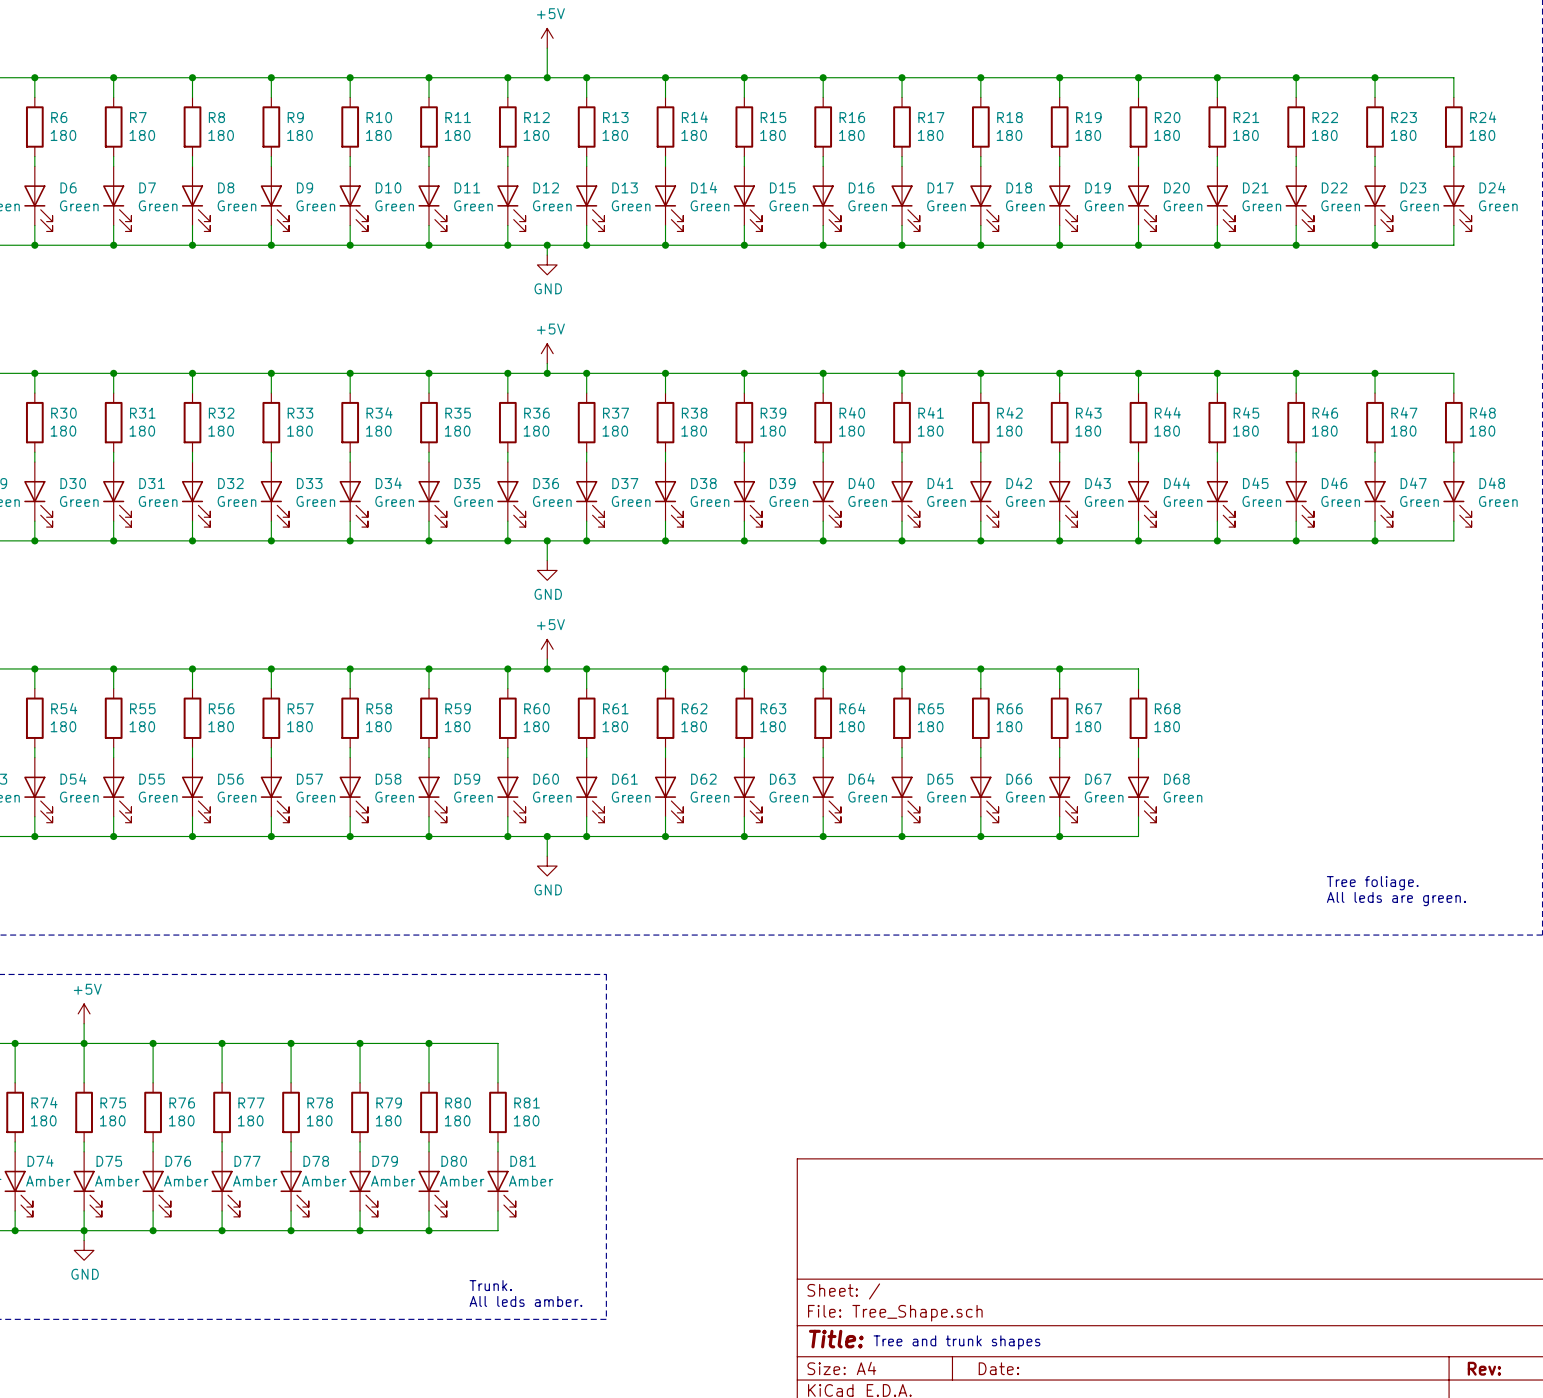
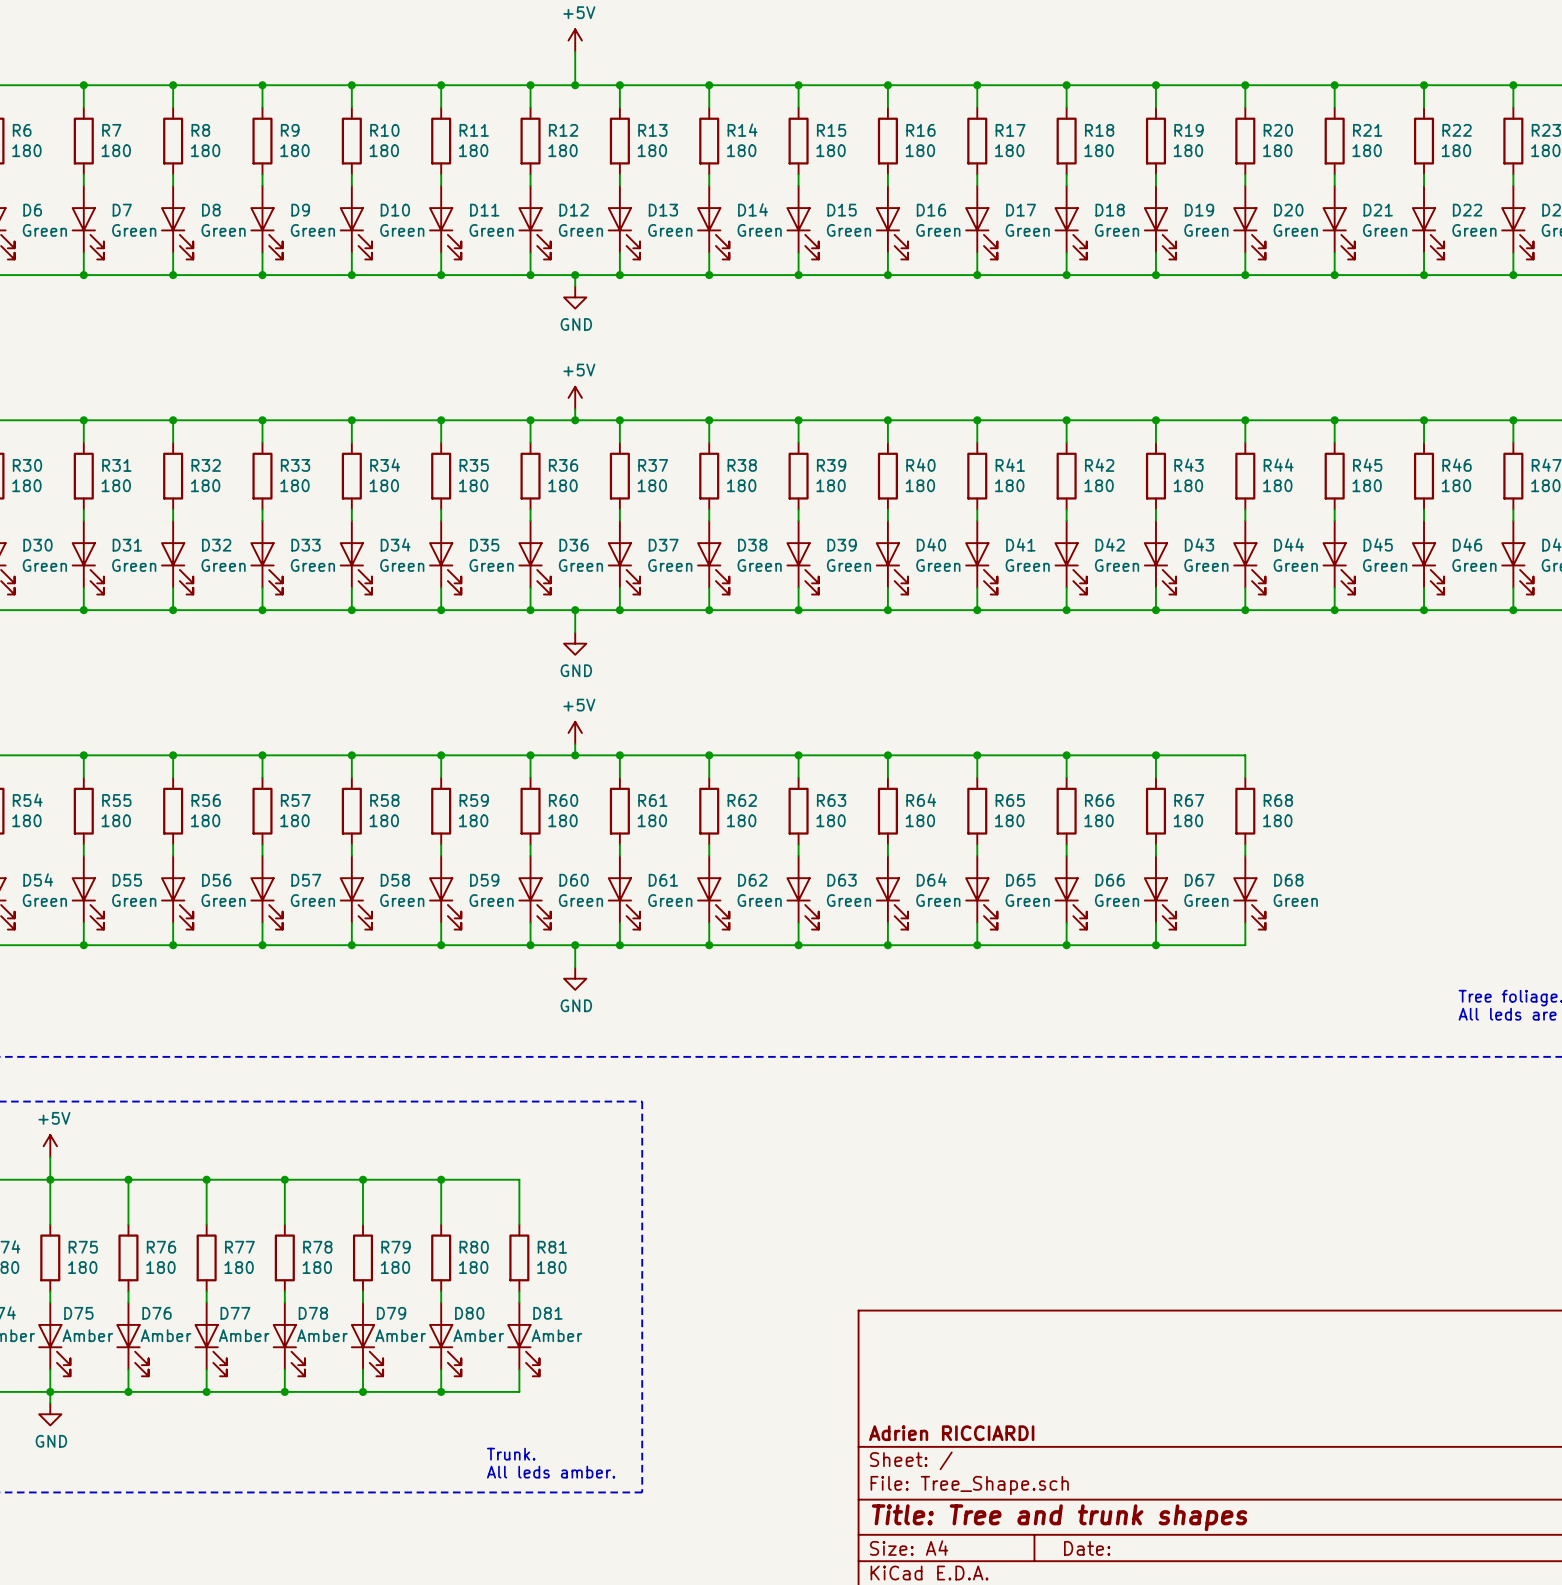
title block: none -> Adrien RICCIARDI (951, 1433)
title block: Title: (836, 1339) -> Title: Tree and trunk shapes (1059, 1517)
text: Tree and trunk shapes (956, 1342) -> none

